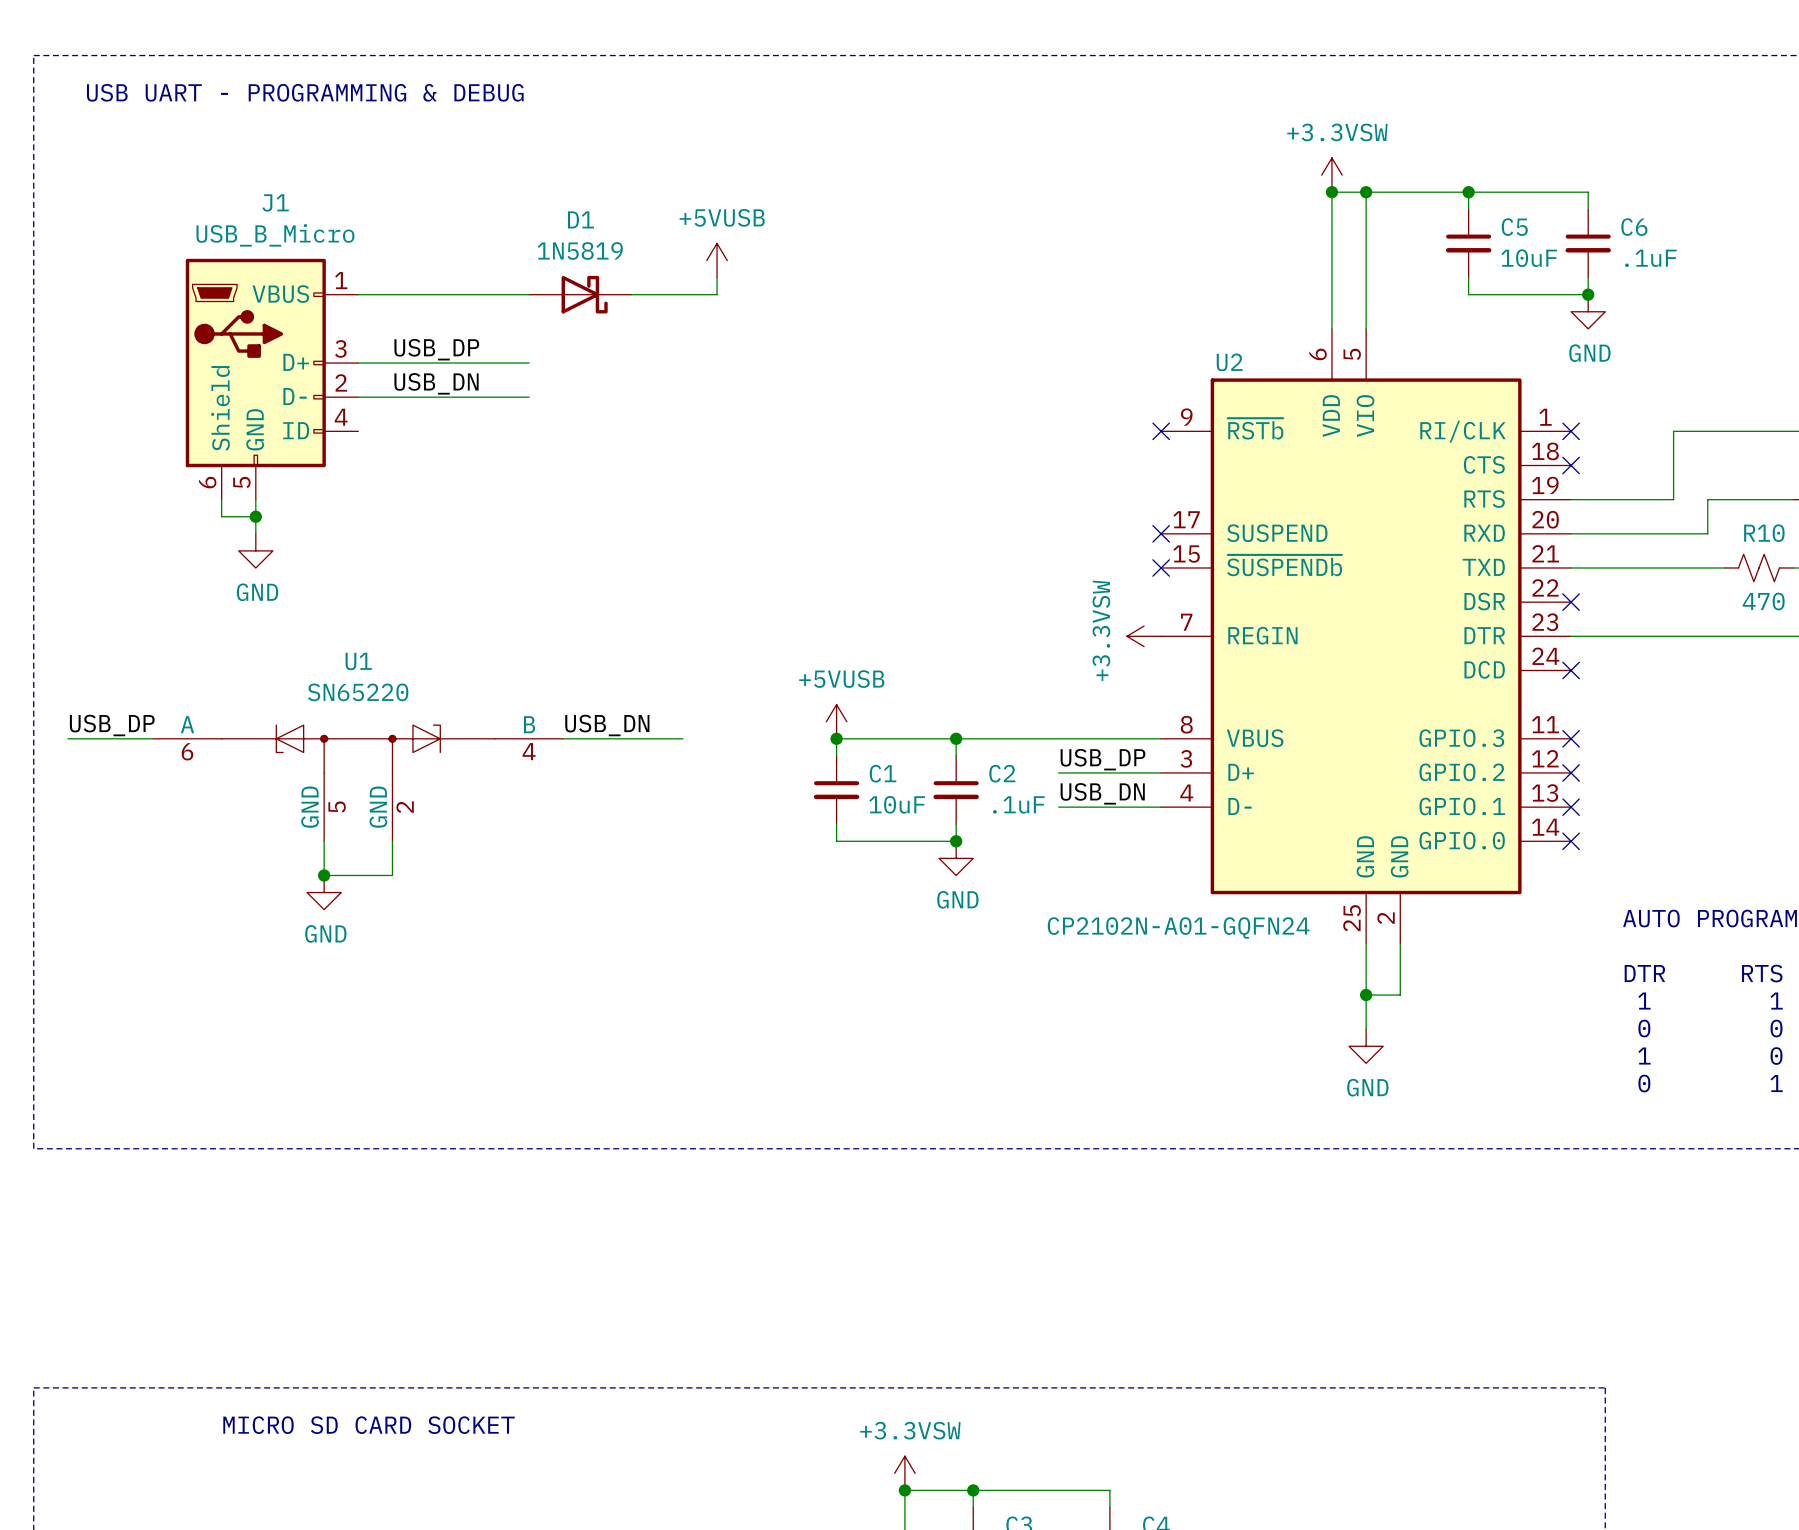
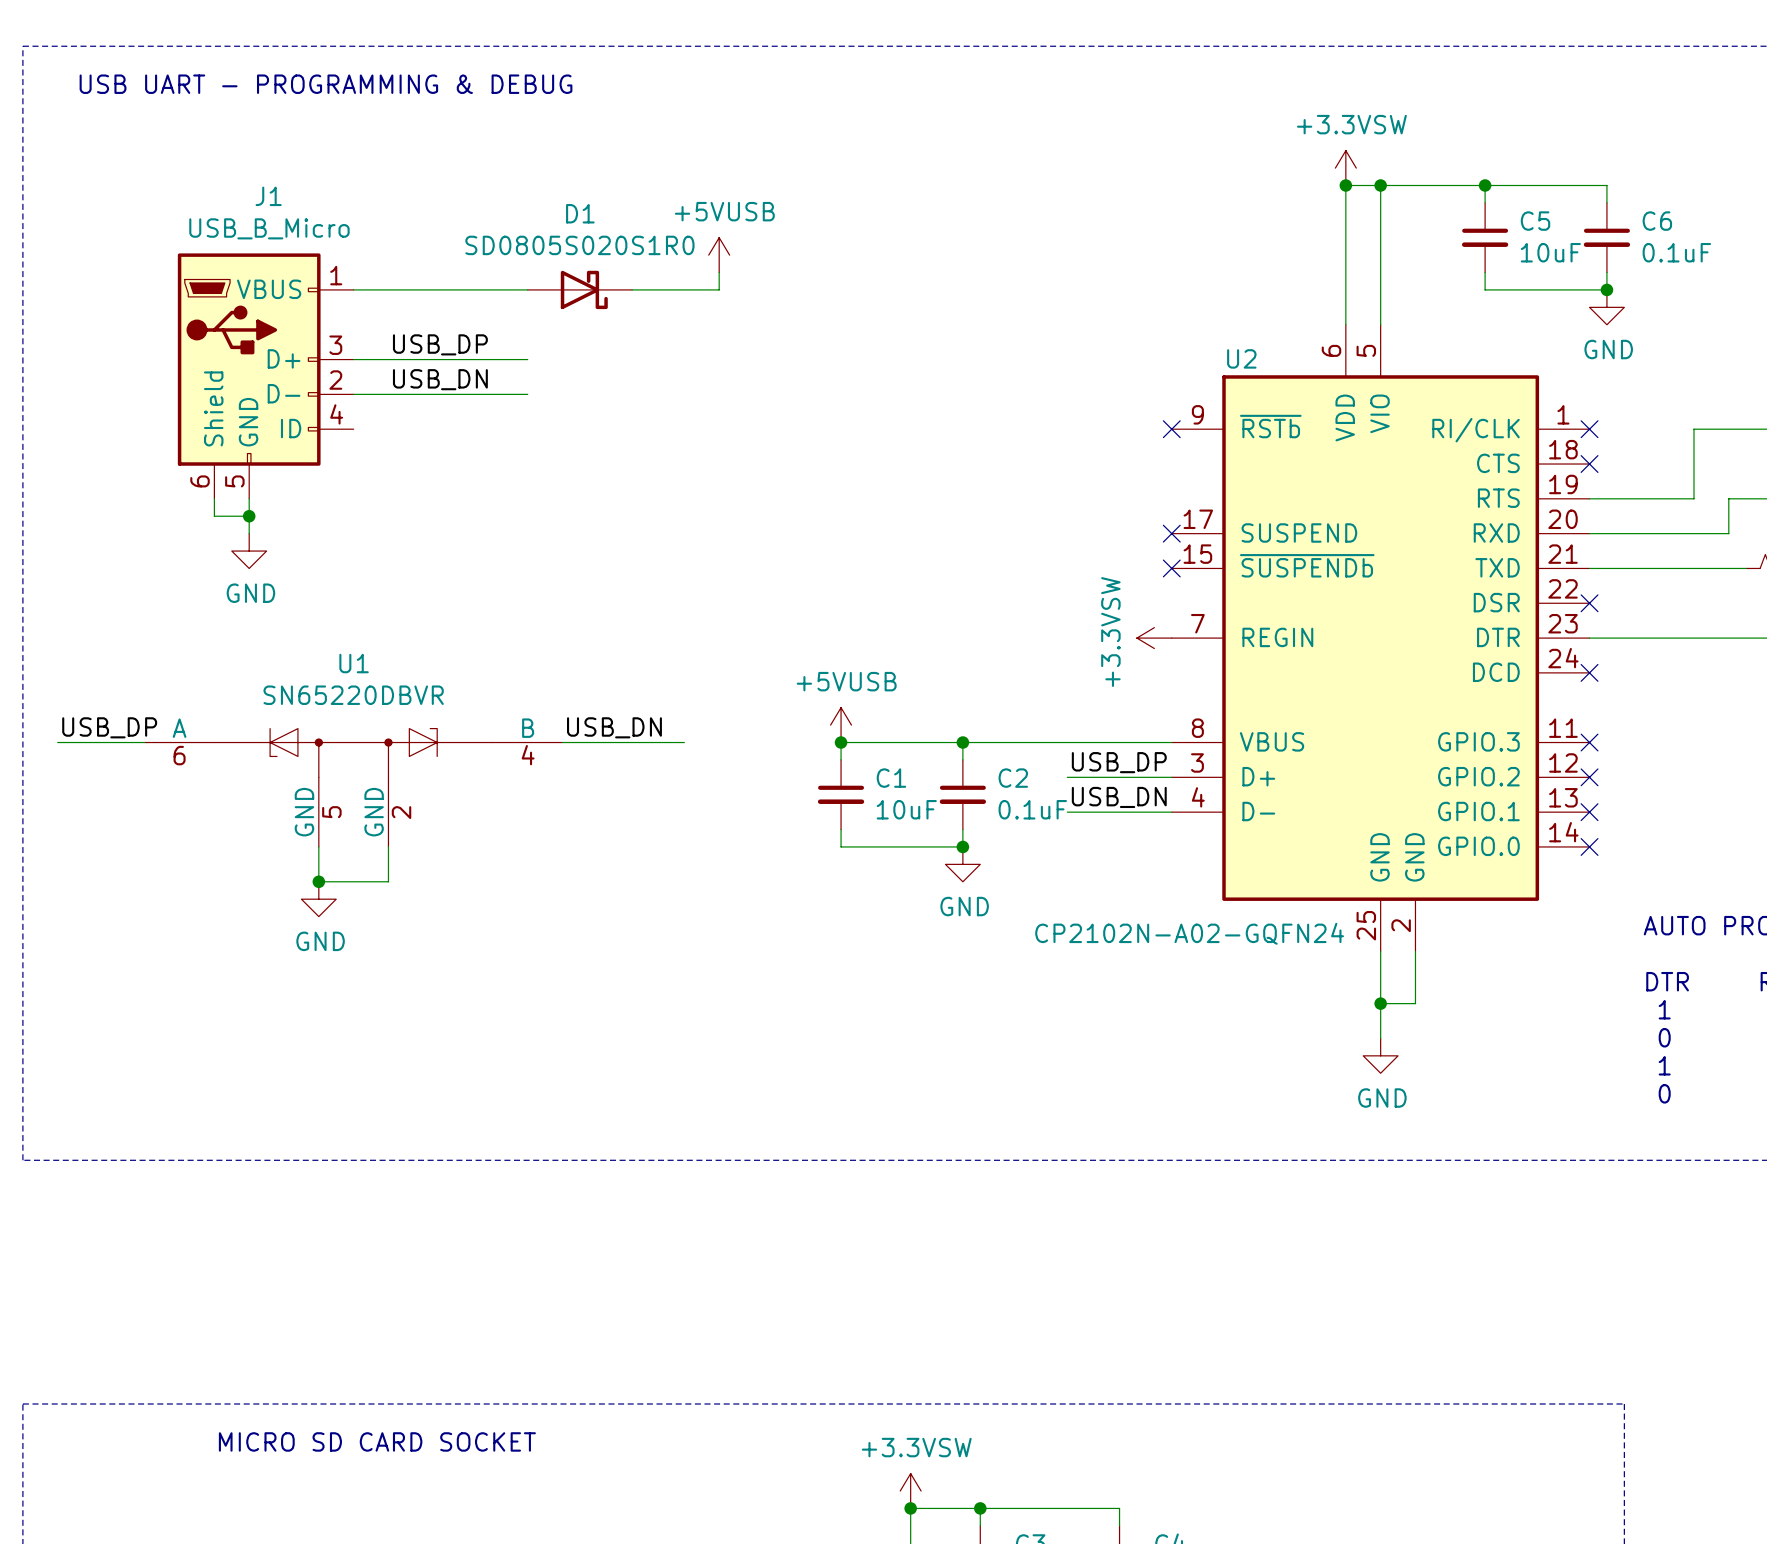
D1 value: 1N5819 (580, 251) -> SD0805S020S1R0 (579, 245)
C6 value: .1uF (1650, 258) -> 0.1uF (1676, 252)
U1 value: SN65220 (358, 692) -> SN65220DBVR (353, 695)
C2 value: .1uF (1018, 804) -> 0.1uF (1032, 809)
U2 value: CP2102N-A01-GQFN24 (1178, 927) -> CP2102N-A02-GQFN24 (1189, 933)

